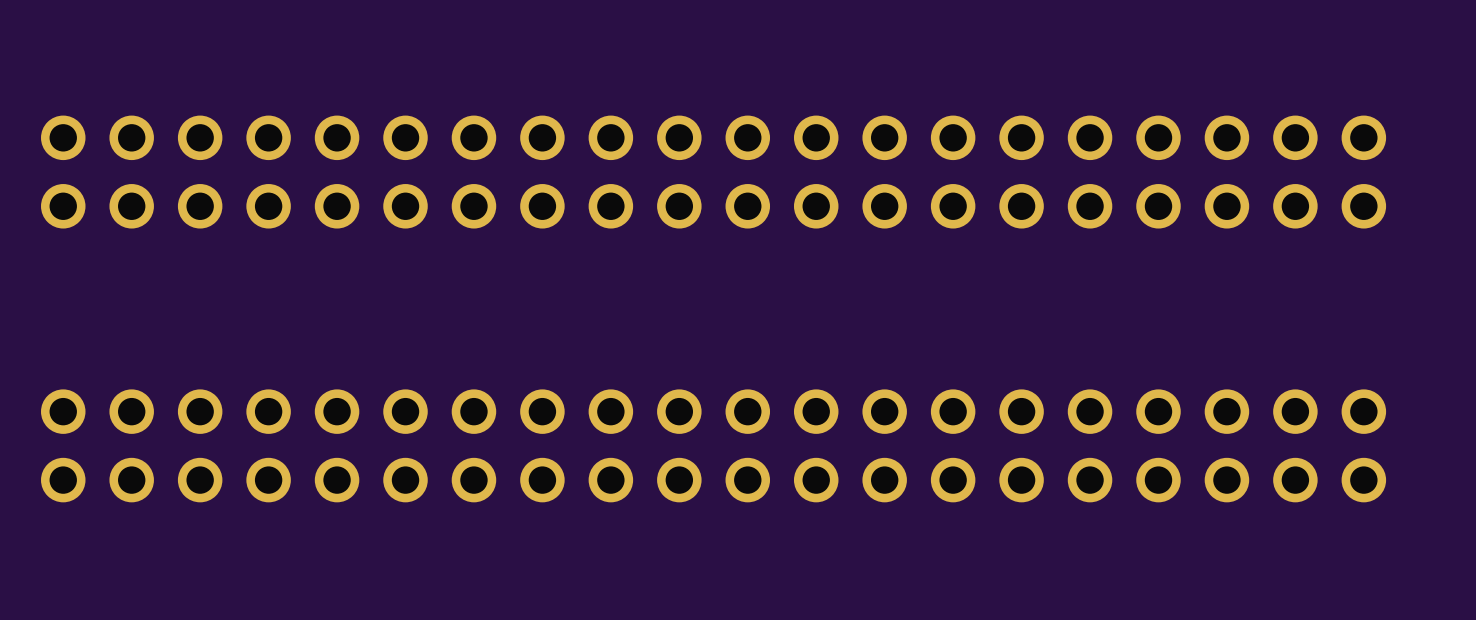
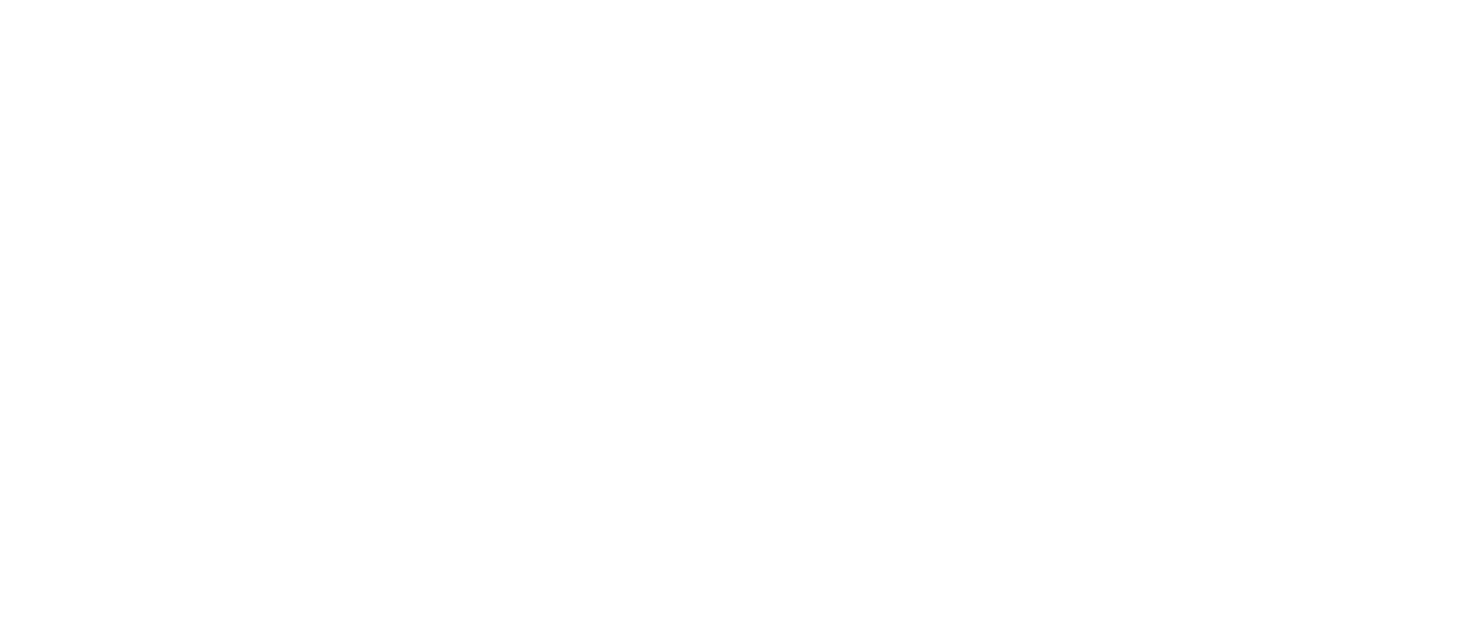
part: (713, 172) -> none
part: (713, 445) -> none

